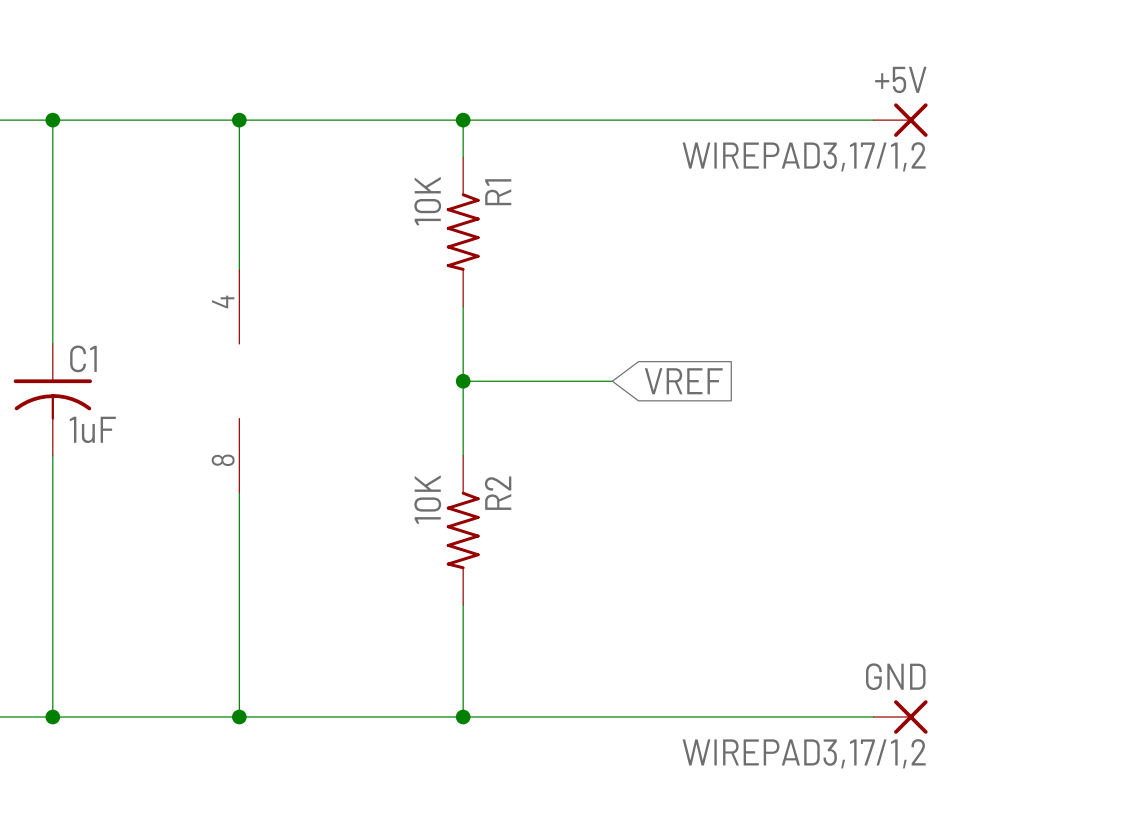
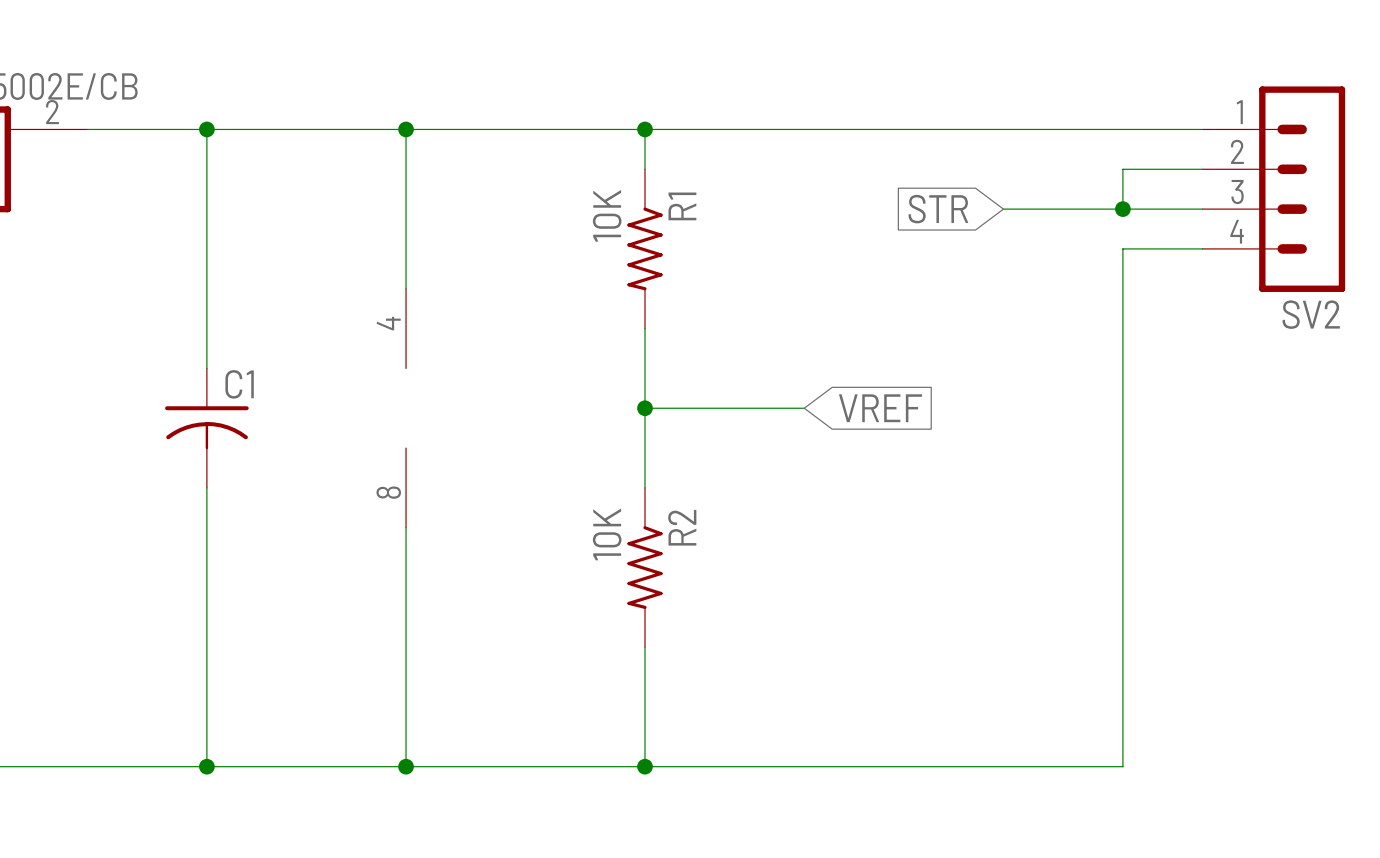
wire: none -> (1083, 129) (1202, 129)
+5V: WIREPAD3,17/1,2 (900, 120) -> none
wire: none -> (1202, 169) (1122, 169) (1122, 209)
SV2: none -> (1273, 189)
global label: none -> STR (938, 209)
wire: none -> (1003, 209) (1202, 209)
junction: none -> (1122, 209)
wire: none -> (1202, 248) (1122, 248) (1122, 766) (1083, 766)
C1 value: 1uF (92, 429) -> none
GND: WIREPAD3,17/1,2 (900, 717) -> none

